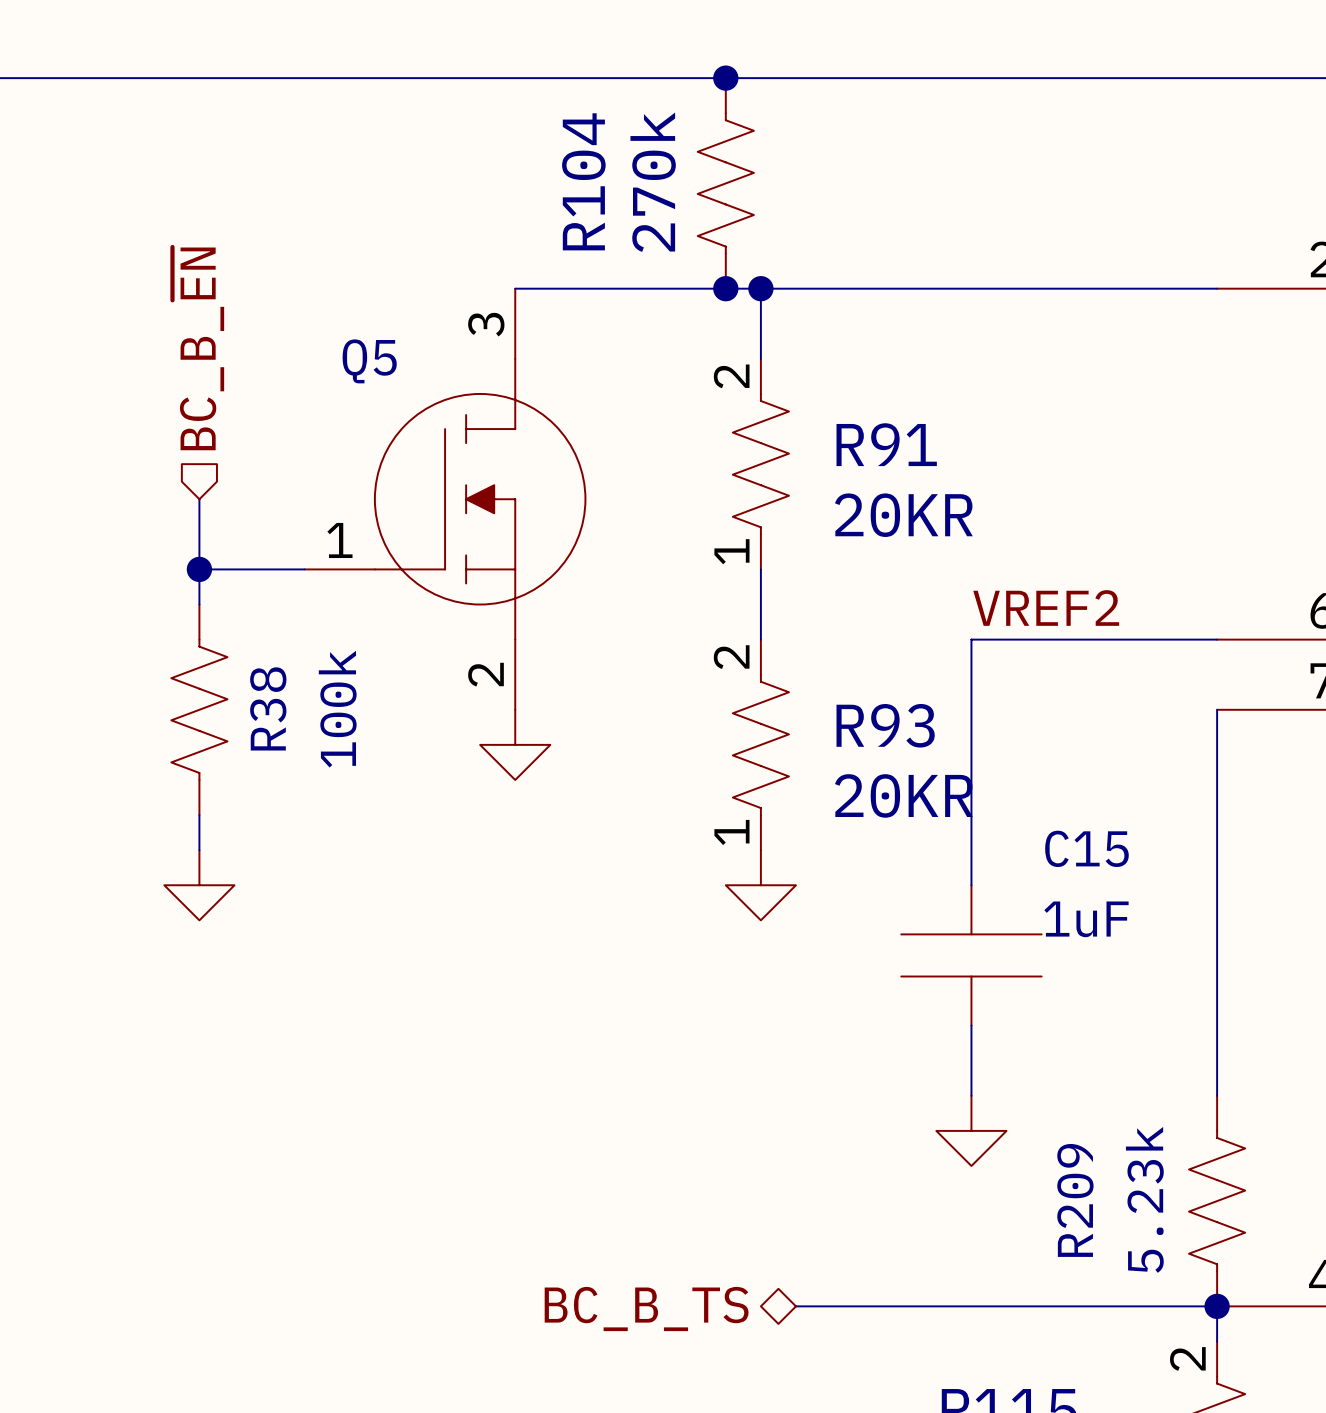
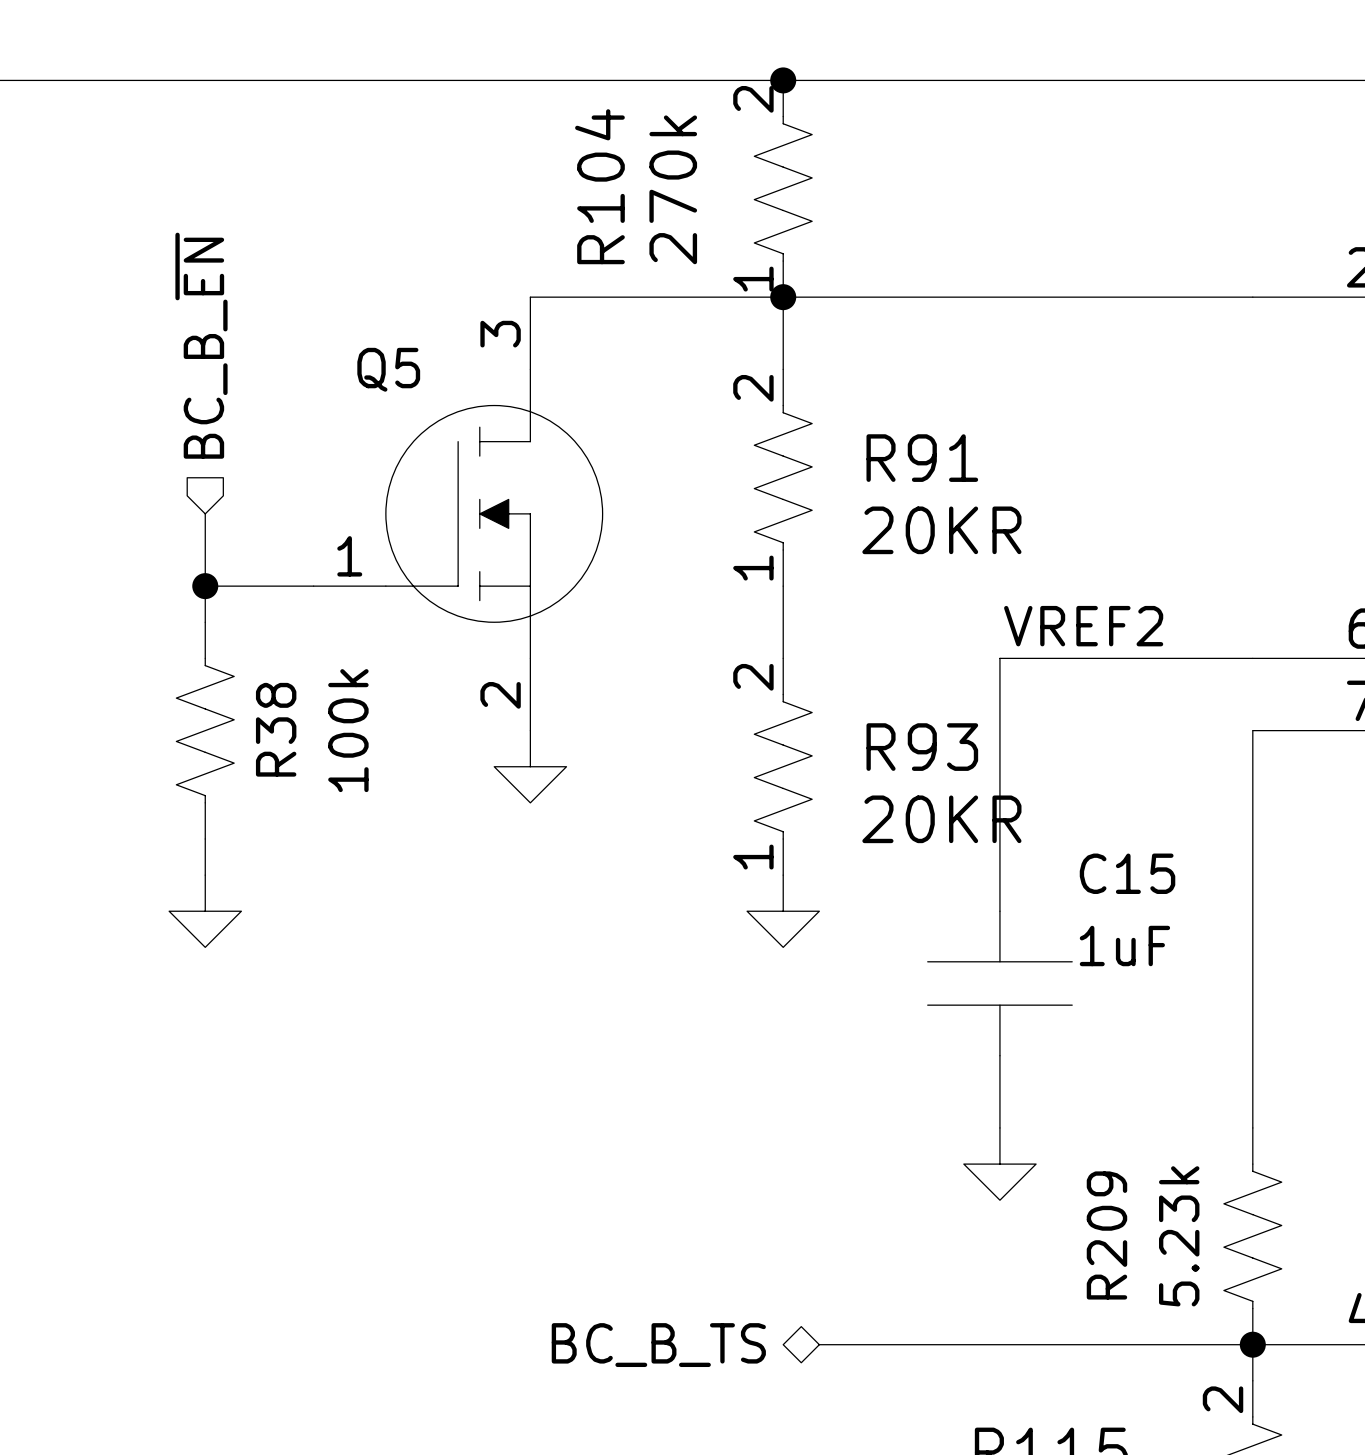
junction position: (725, 78) -> (783, 80)
R104 pin number: none -> 2 (753, 99)
R104 position: (725, 183) -> (783, 188)
R104 pin number: none -> 1 (753, 279)
junction: (725, 288) -> none

